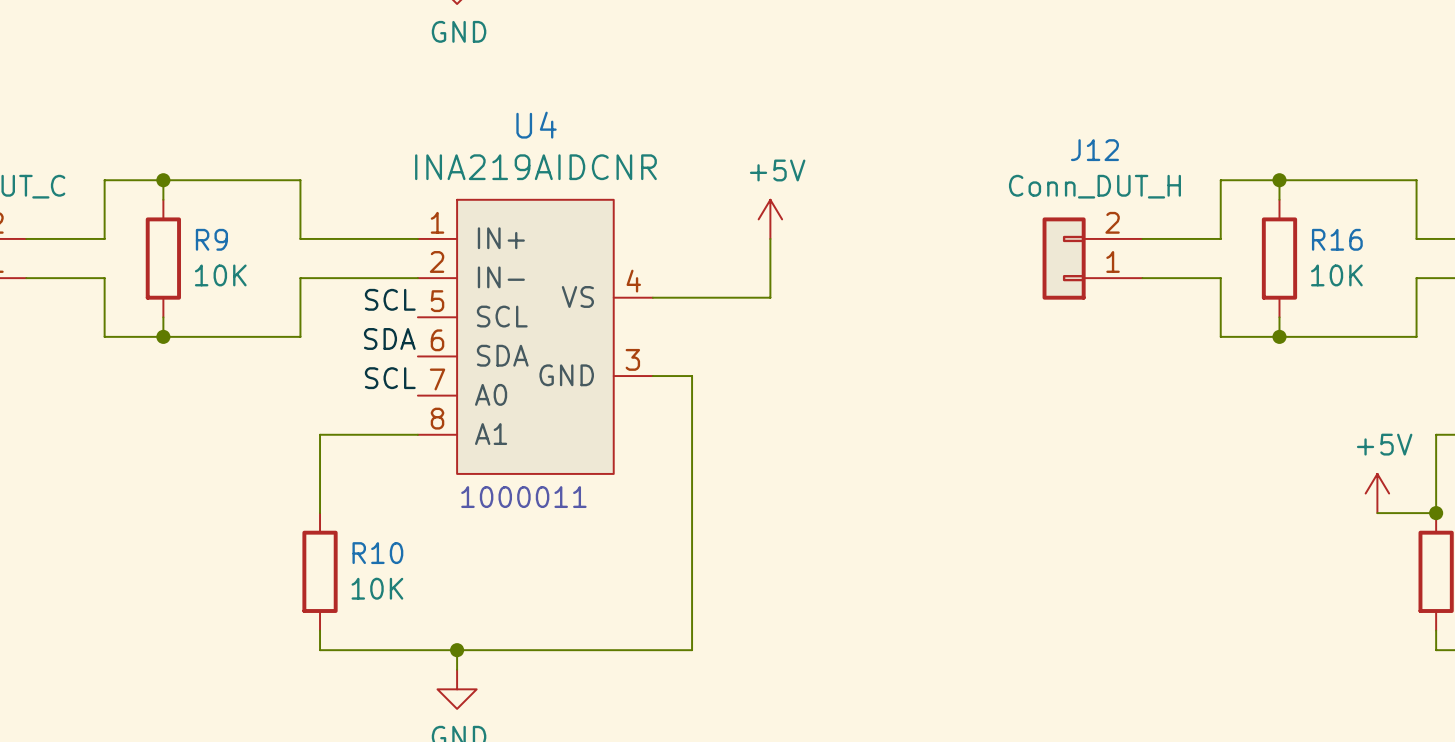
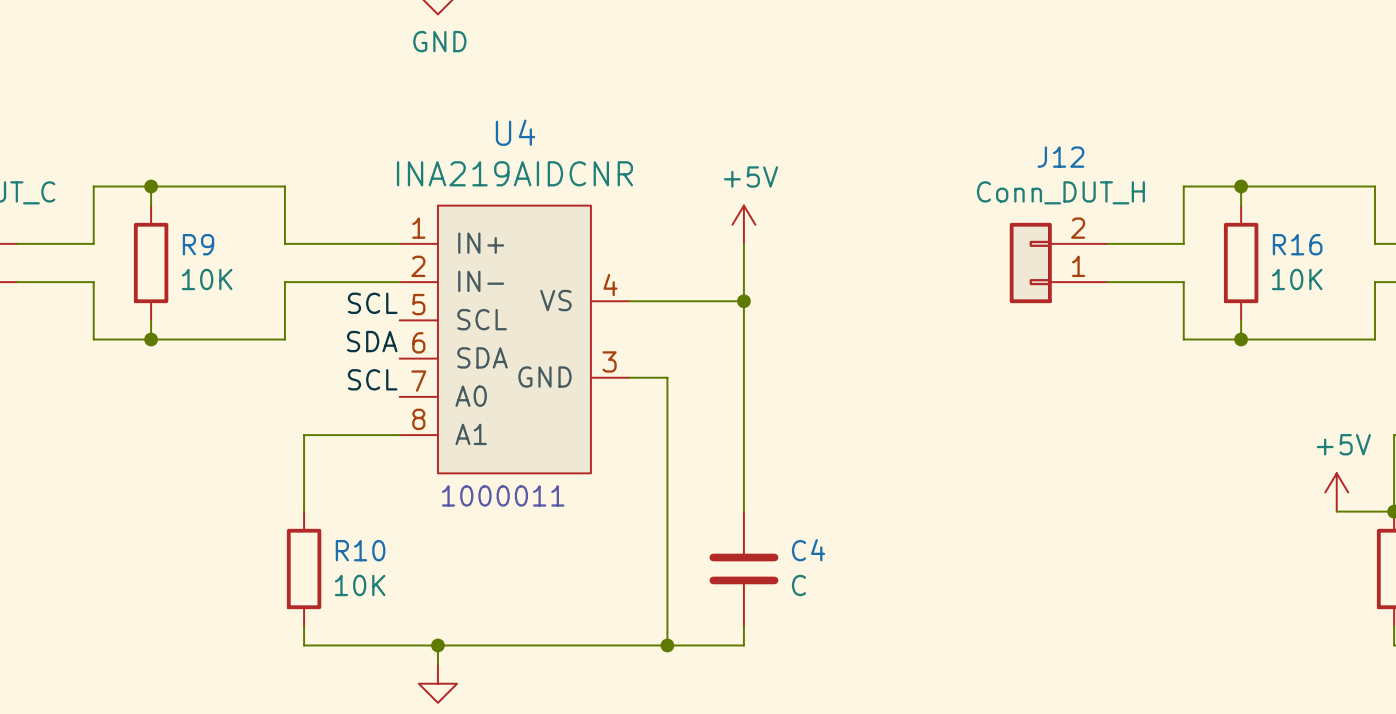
wire: none -> (743, 301) (743, 511)
junction: none -> (743, 301)
C4: none -> C (743, 568)
wire: none -> (743, 626) (743, 645) (667, 645)
junction: none -> (667, 645)

